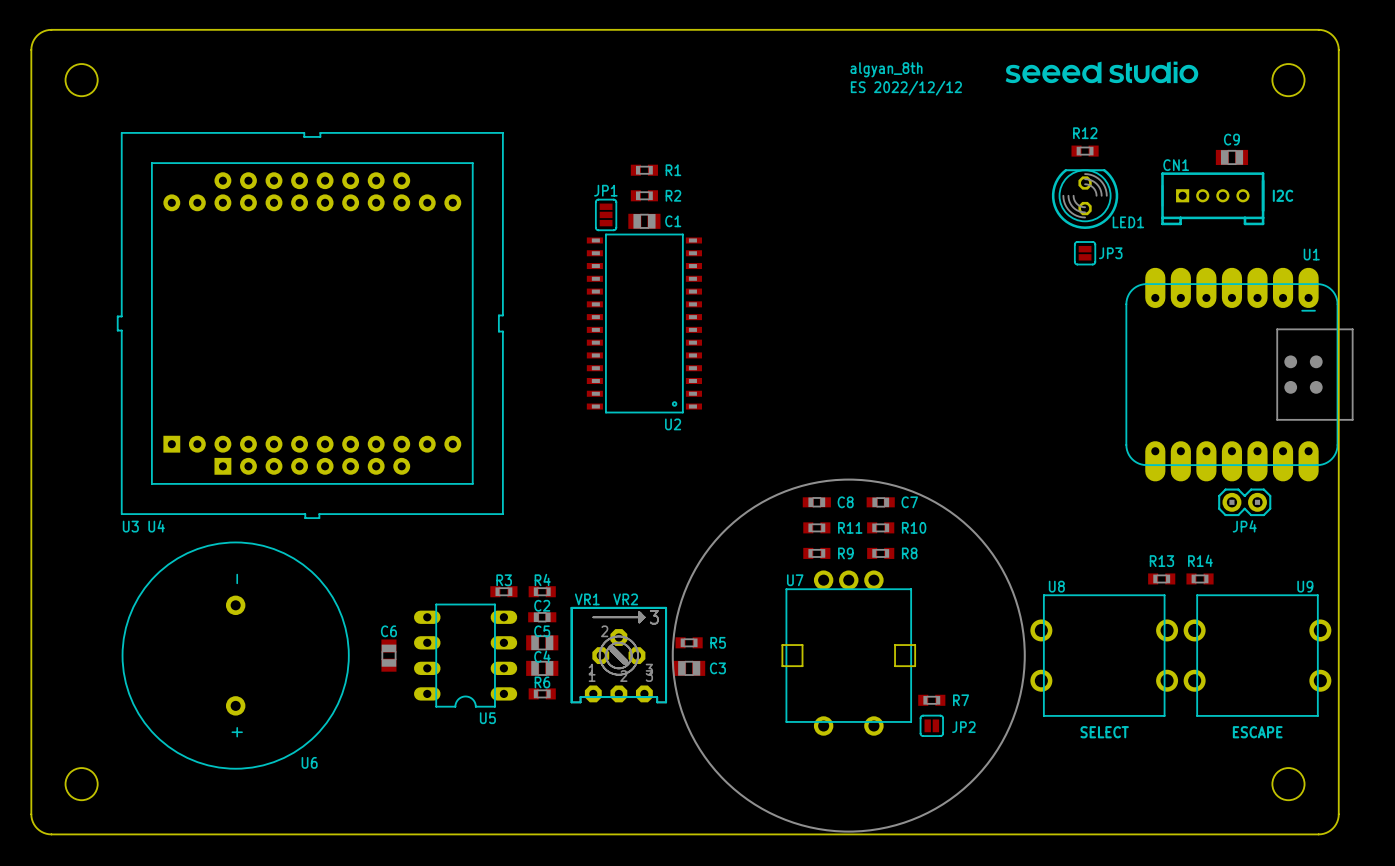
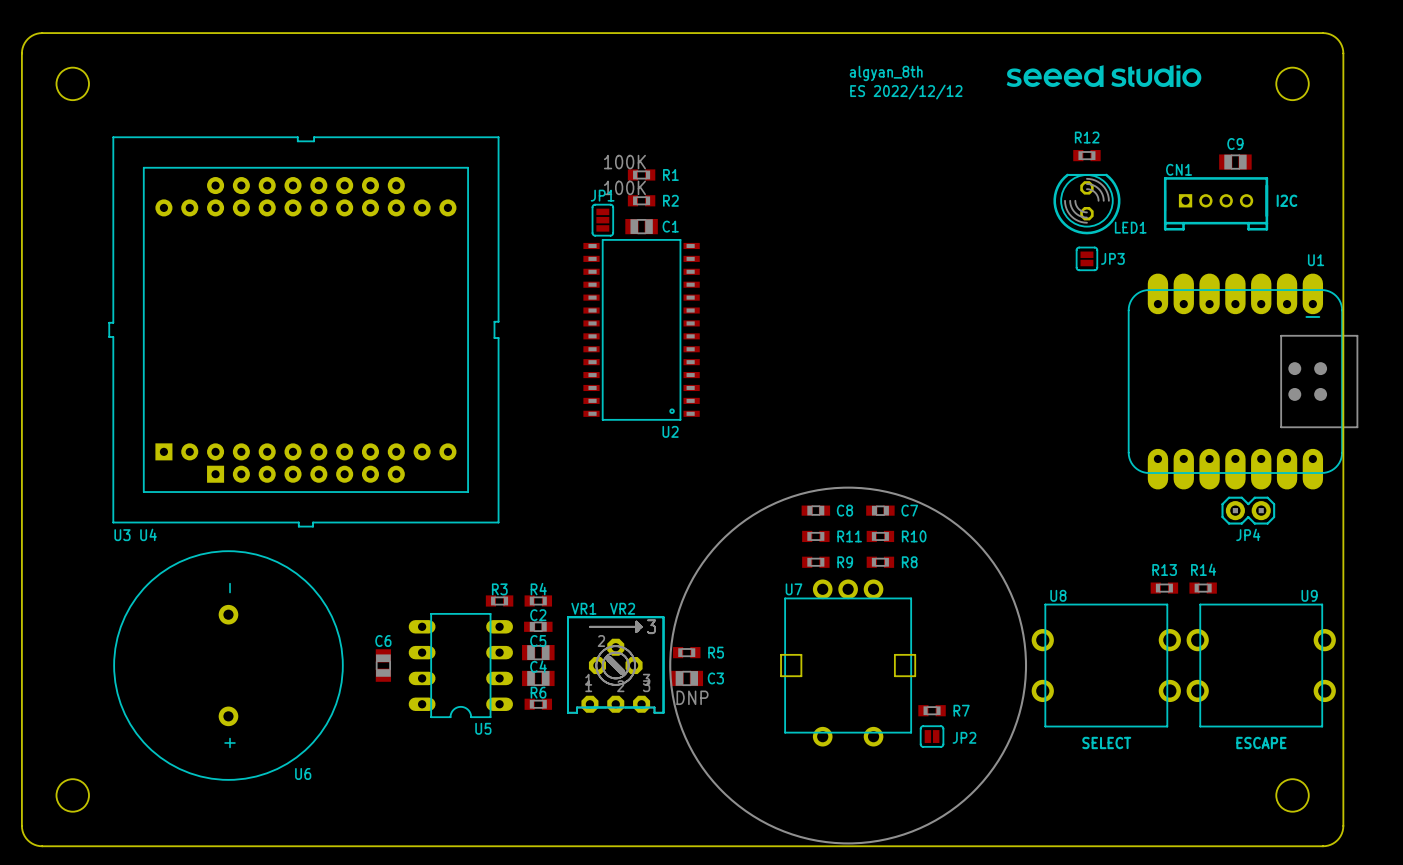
R1 value: none -> 100K (624, 162)
R2 value: none -> 100K (624, 187)
C3 value: none -> DNP (692, 697)

